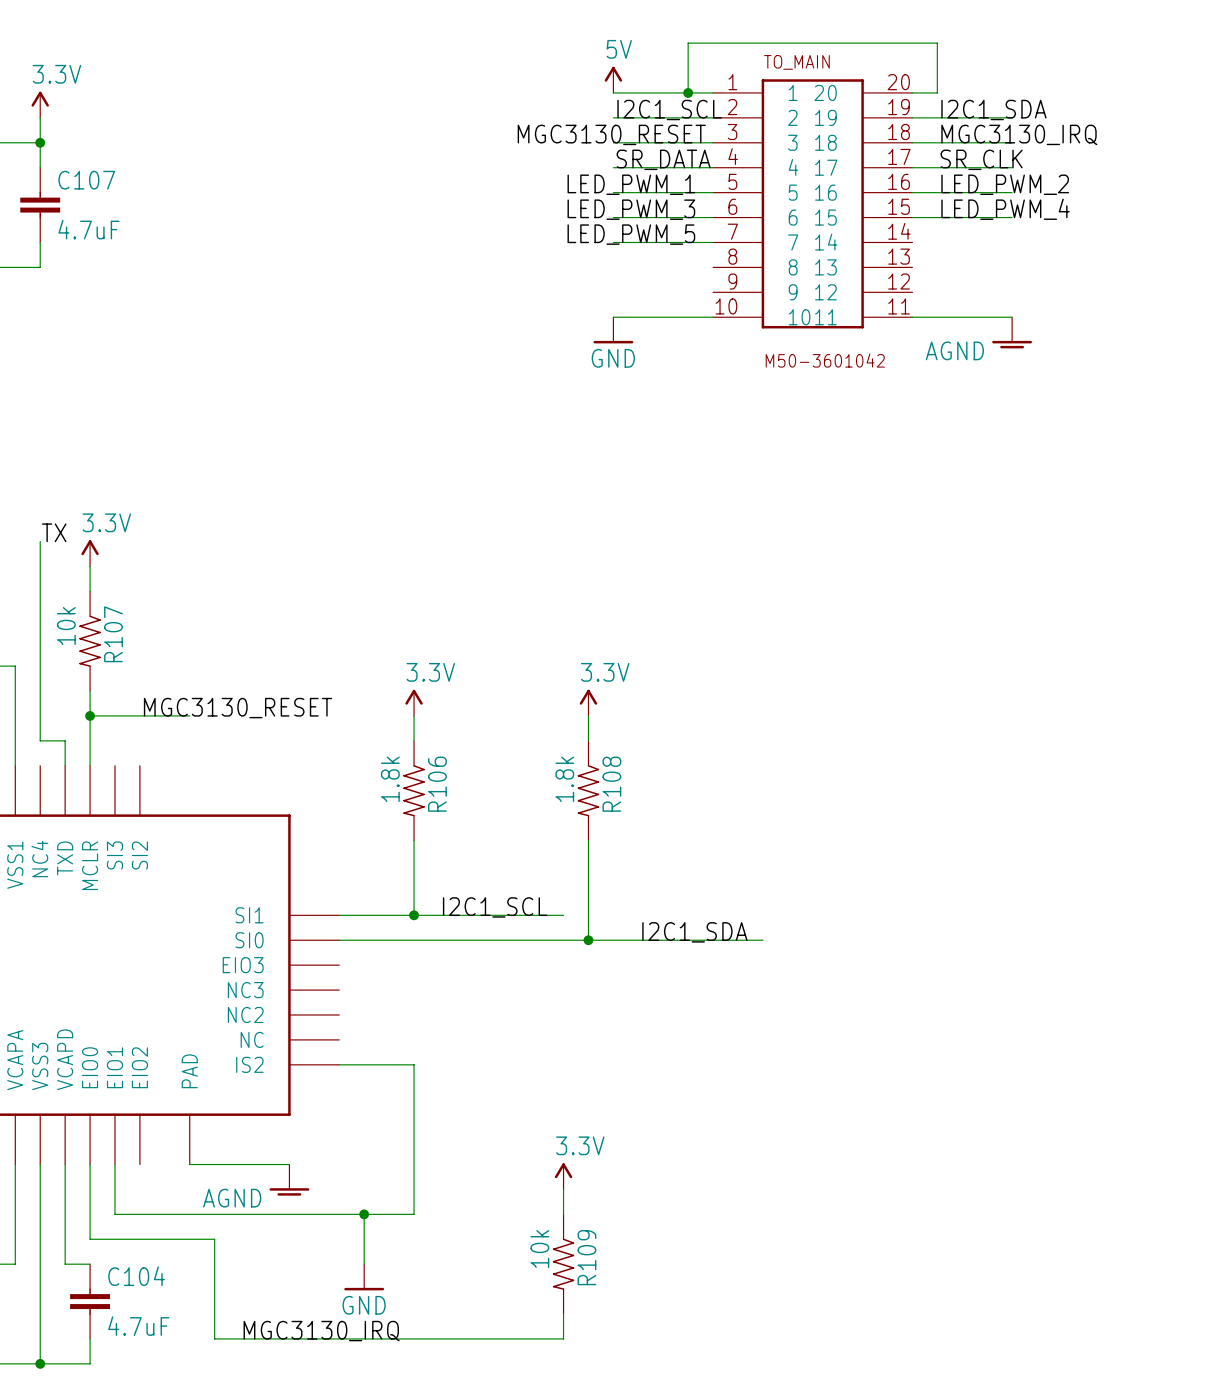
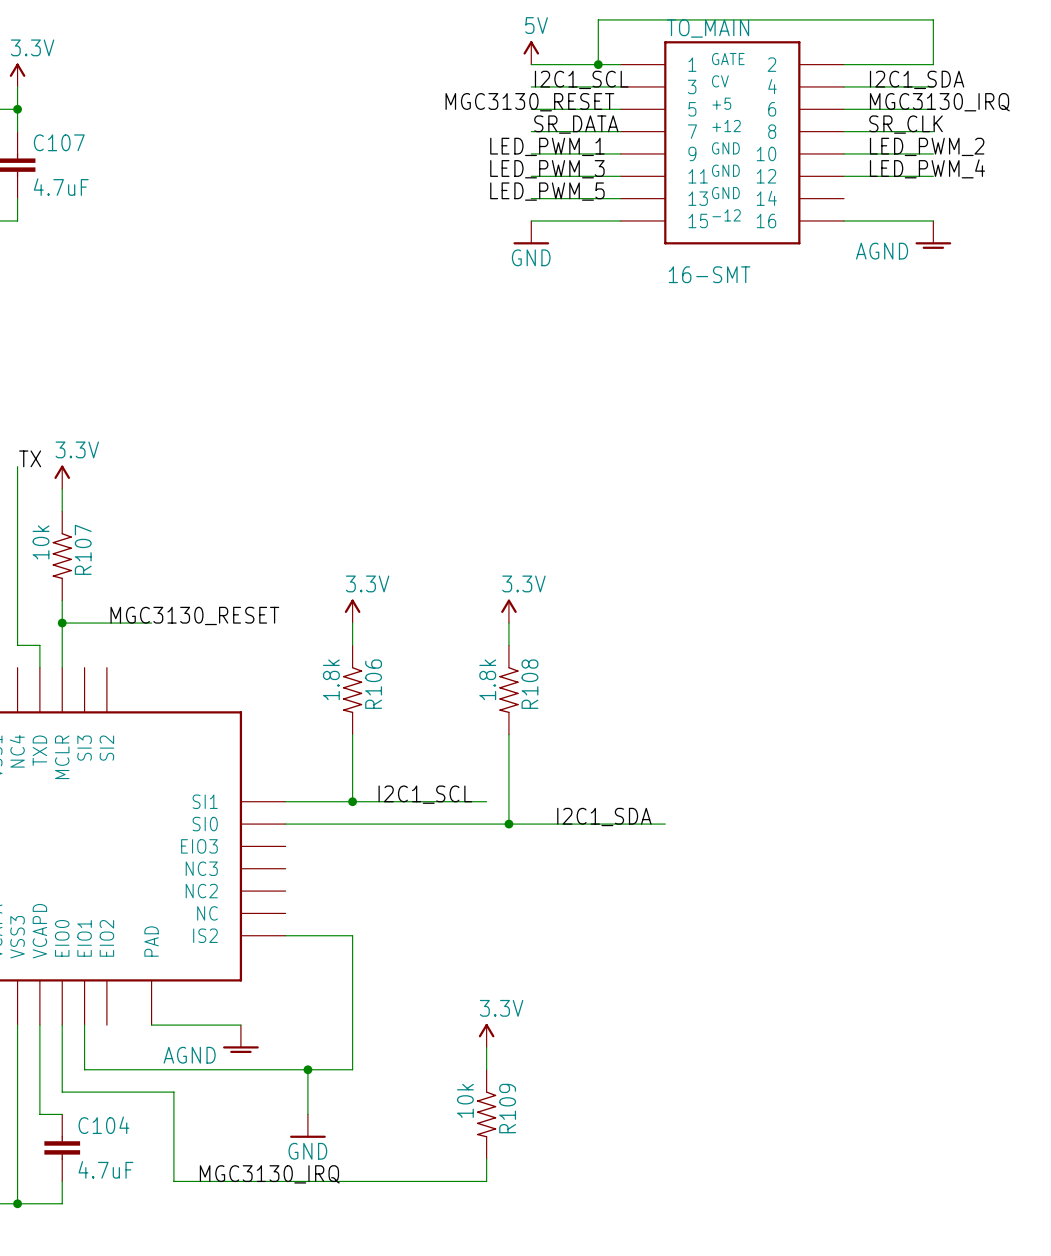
wire: (937, 43) (937, 92) (912, 92) -> (821, 19) (933, 19) (933, 64) (844, 64)
label position: I2C1_SDA (993, 109) -> I2C1_SDA (917, 79)
label position: MGC3130_IRQ (1019, 134) -> MGC3130_IRQ (939, 102)
label position: SR_CLK (981, 159) -> SR_CLK (906, 124)
TO_MAIN: none -> 16-SMT (732, 142)
label position: LED_PWM_2 (1005, 184) -> LED_PWM_2 (927, 146)
TO_MAIN: M50-3601042 (812, 203) -> none
label position: LED_PWM_4 (1005, 209) -> LED_PWM_4 (927, 168)
wire: (613, 317) (713, 317) -> (531, 220) (620, 220)
wire: (912, 317) (1012, 317) -> (844, 220) (933, 220)
power symbol position: GND (613, 330) -> GND (531, 232)
power symbol position: AGND (1012, 332) -> AGND (933, 234)

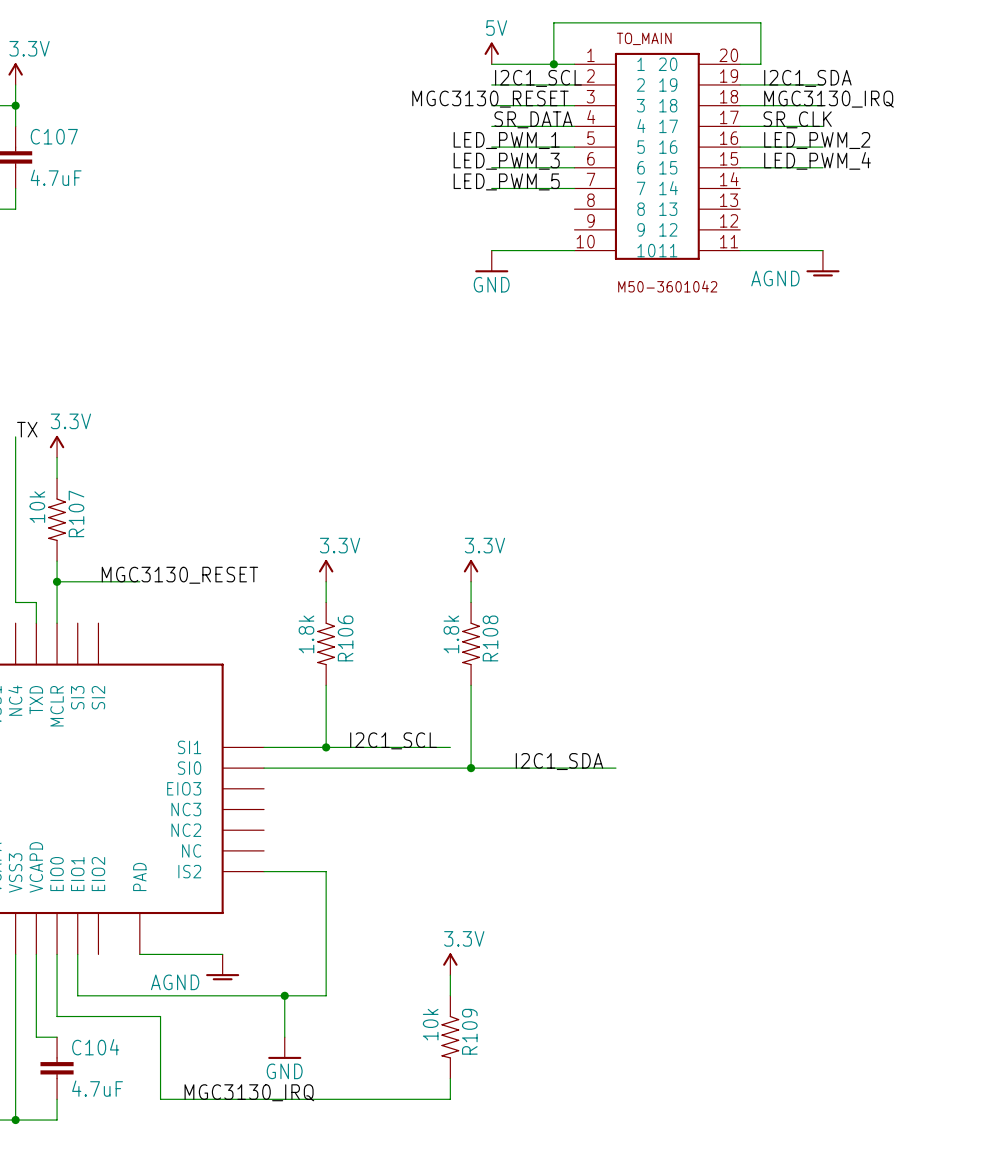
wire: (821, 19) (933, 19) (933, 64) (844, 64) -> (760, 22) (760, 64) (740, 64)
label position: I2C1_SDA (917, 79) -> I2C1_SDA (807, 78)
label position: MGC3130_IRQ (939, 102) -> MGC3130_IRQ (829, 99)
label position: SR_CLK (906, 124) -> SR_CLK (797, 119)
TO_MAIN: 16-SMT (732, 142) -> none
label position: LED_PWM_2 (927, 146) -> LED_PWM_2 (817, 140)
TO_MAIN: none -> M50-3601042 (657, 156)
label position: LED_PWM_4 (927, 168) -> LED_PWM_4 (817, 160)
wire: (531, 220) (620, 220) -> (491, 250) (574, 250)
wire: (844, 220) (933, 220) -> (740, 250) (822, 250)
power symbol position: GND (531, 232) -> GND (491, 261)
power symbol position: AGND (933, 234) -> AGND (822, 263)

